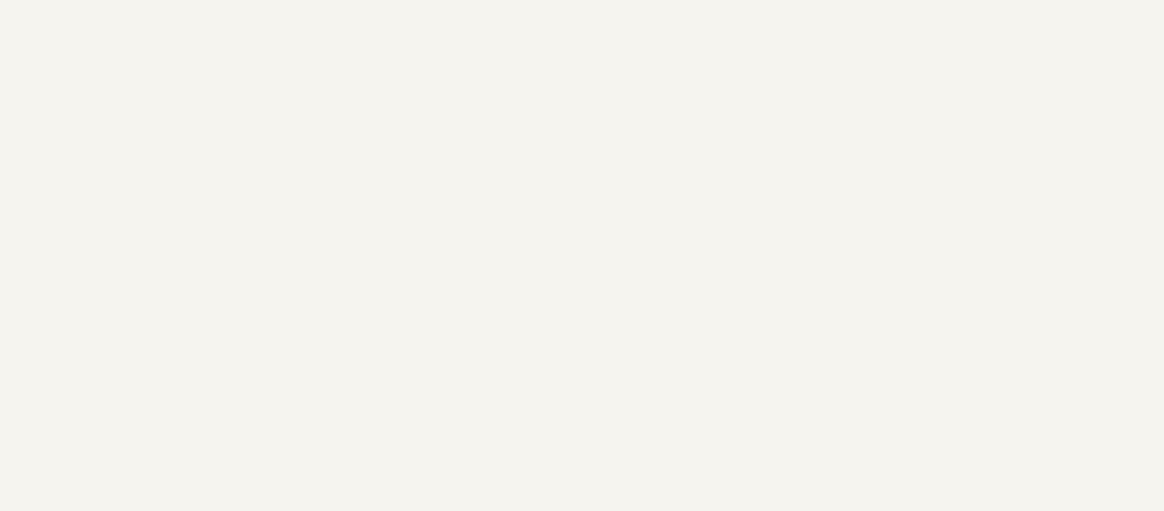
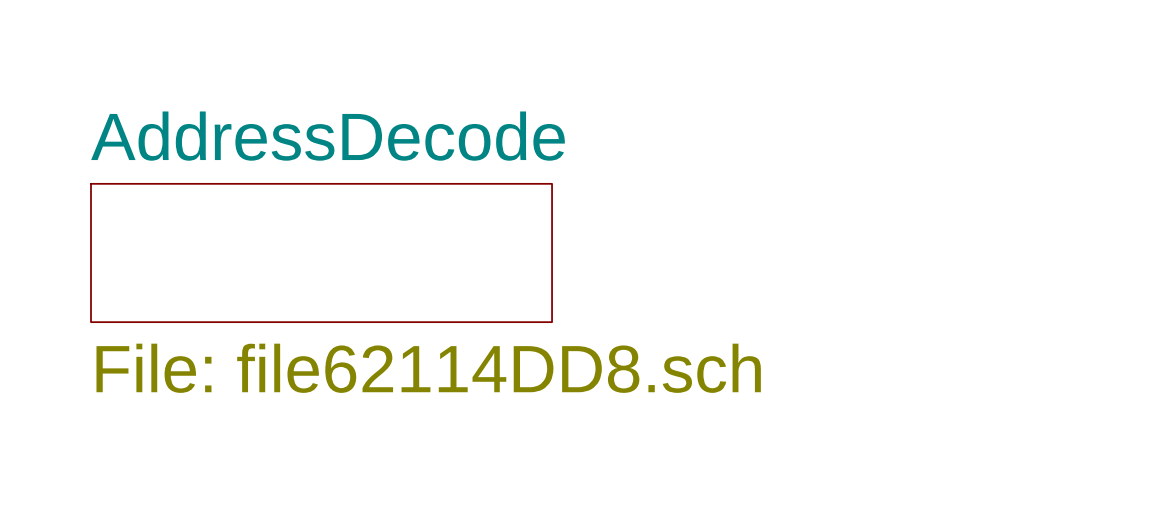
sheet AddressDecode: none -> File: file62114DD8.sch (321, 252)

